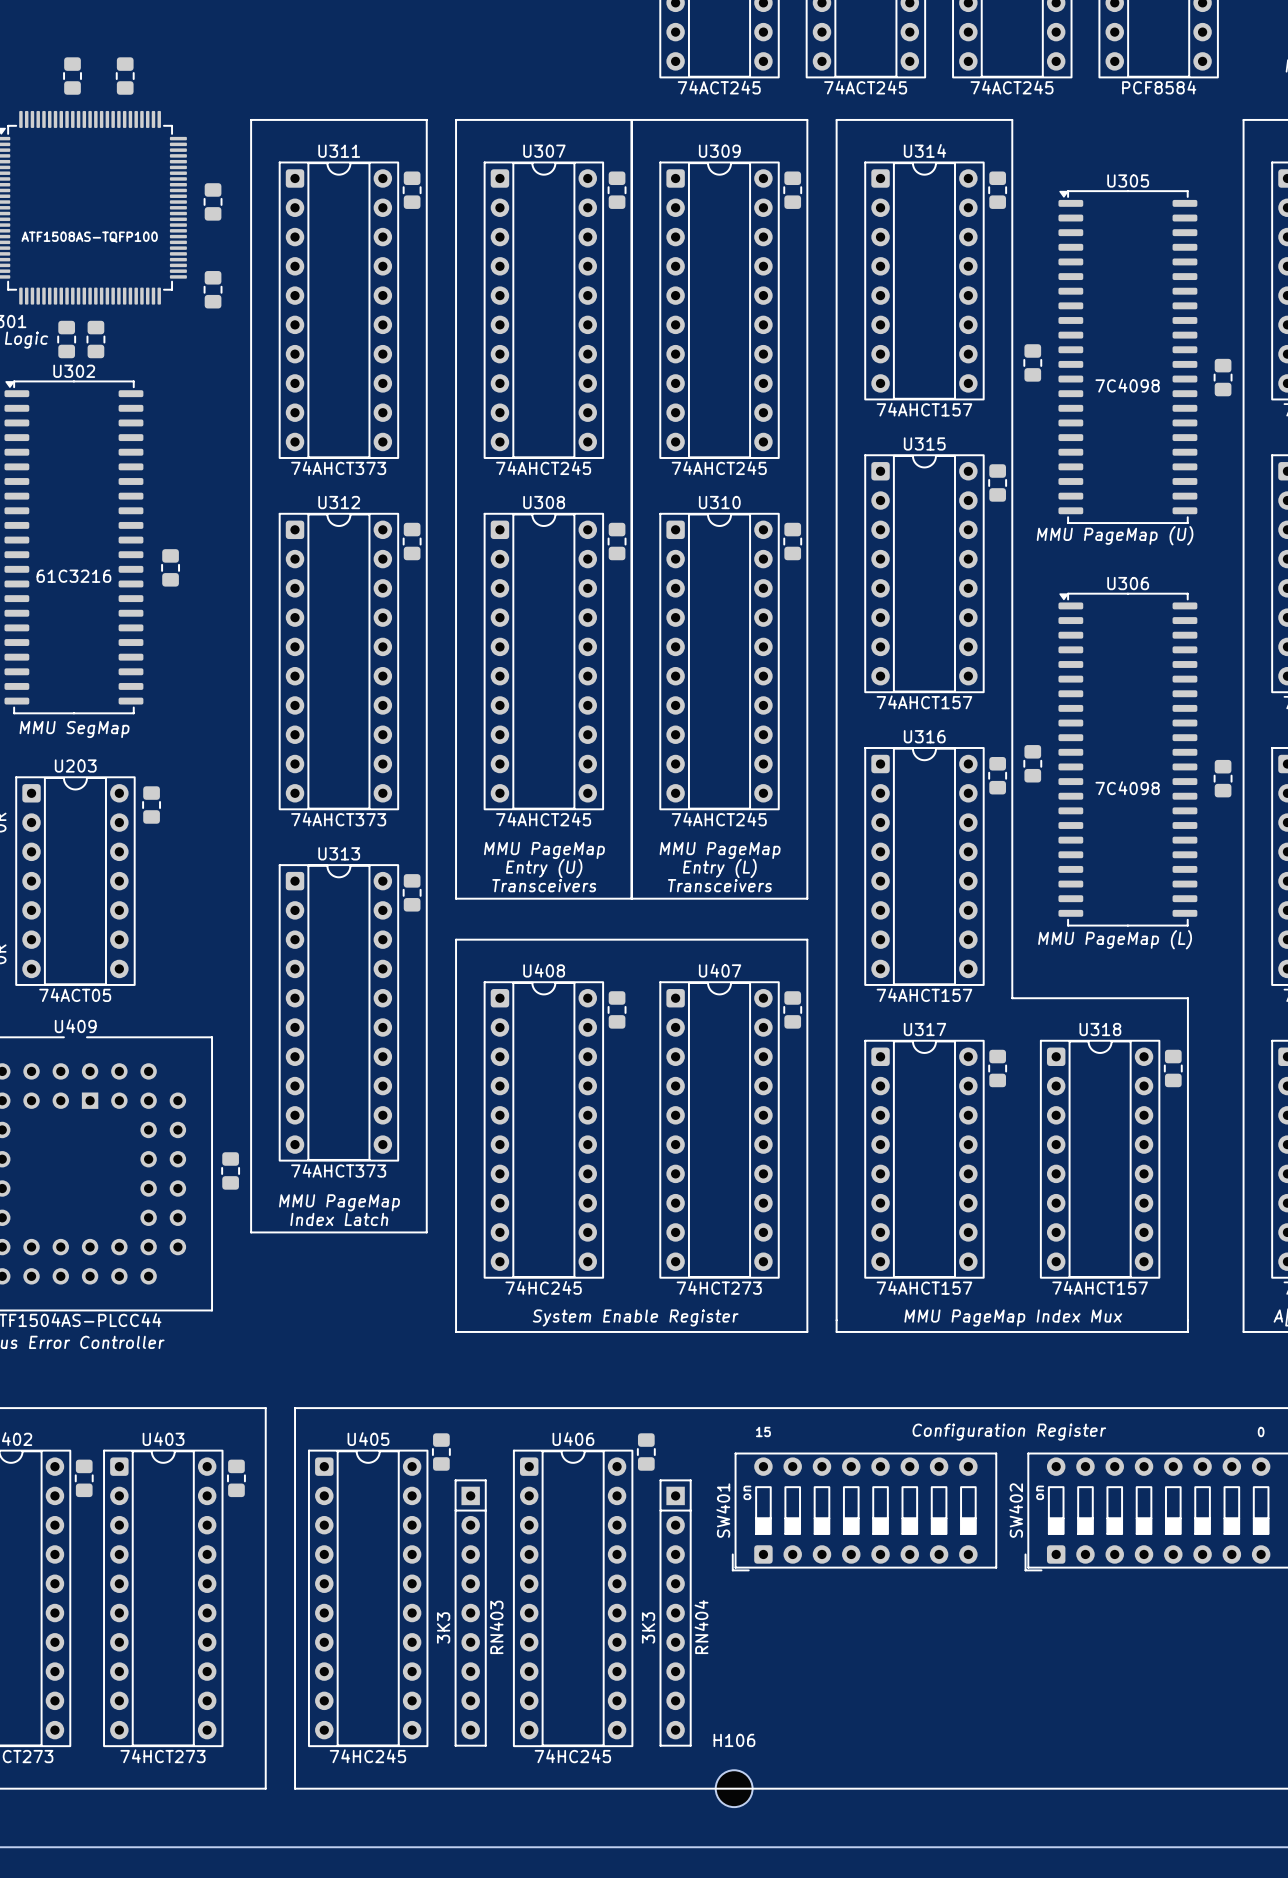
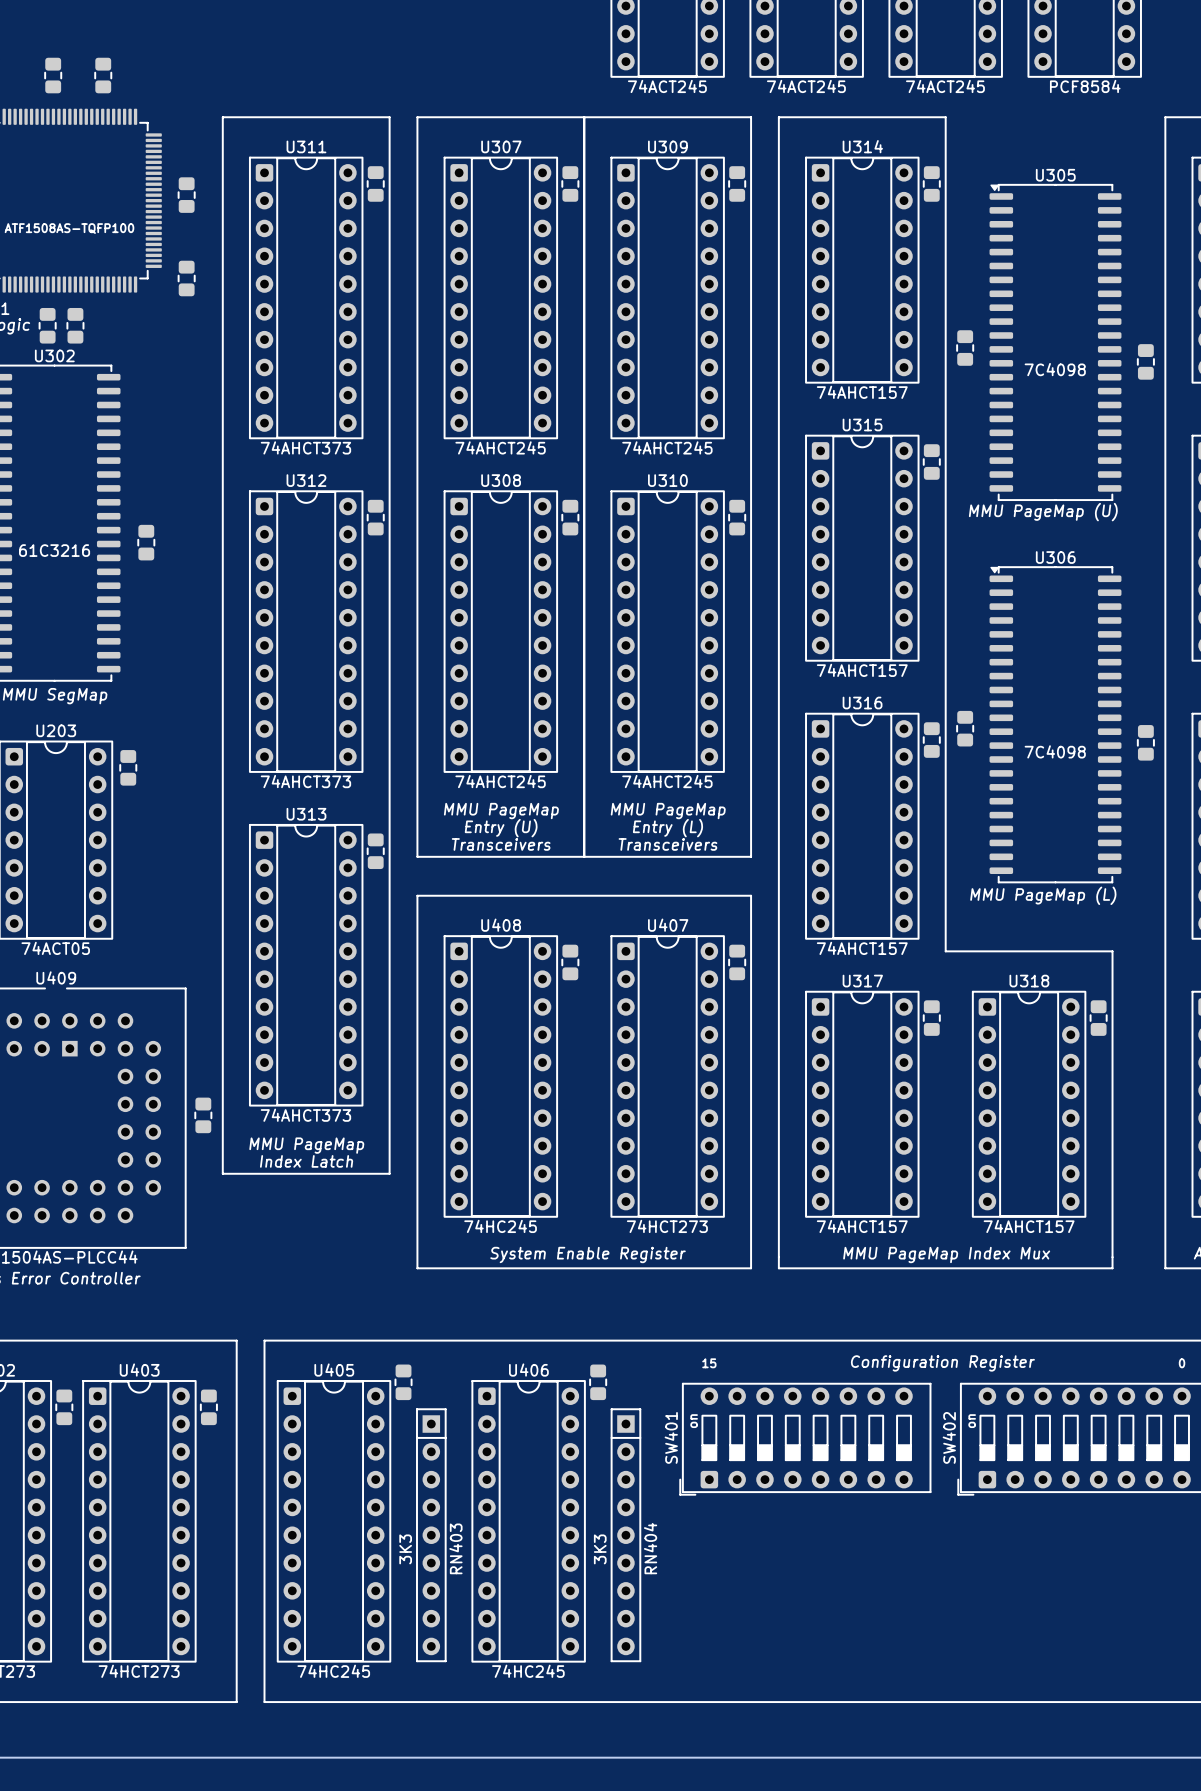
H106: (734, 1788) -> none

